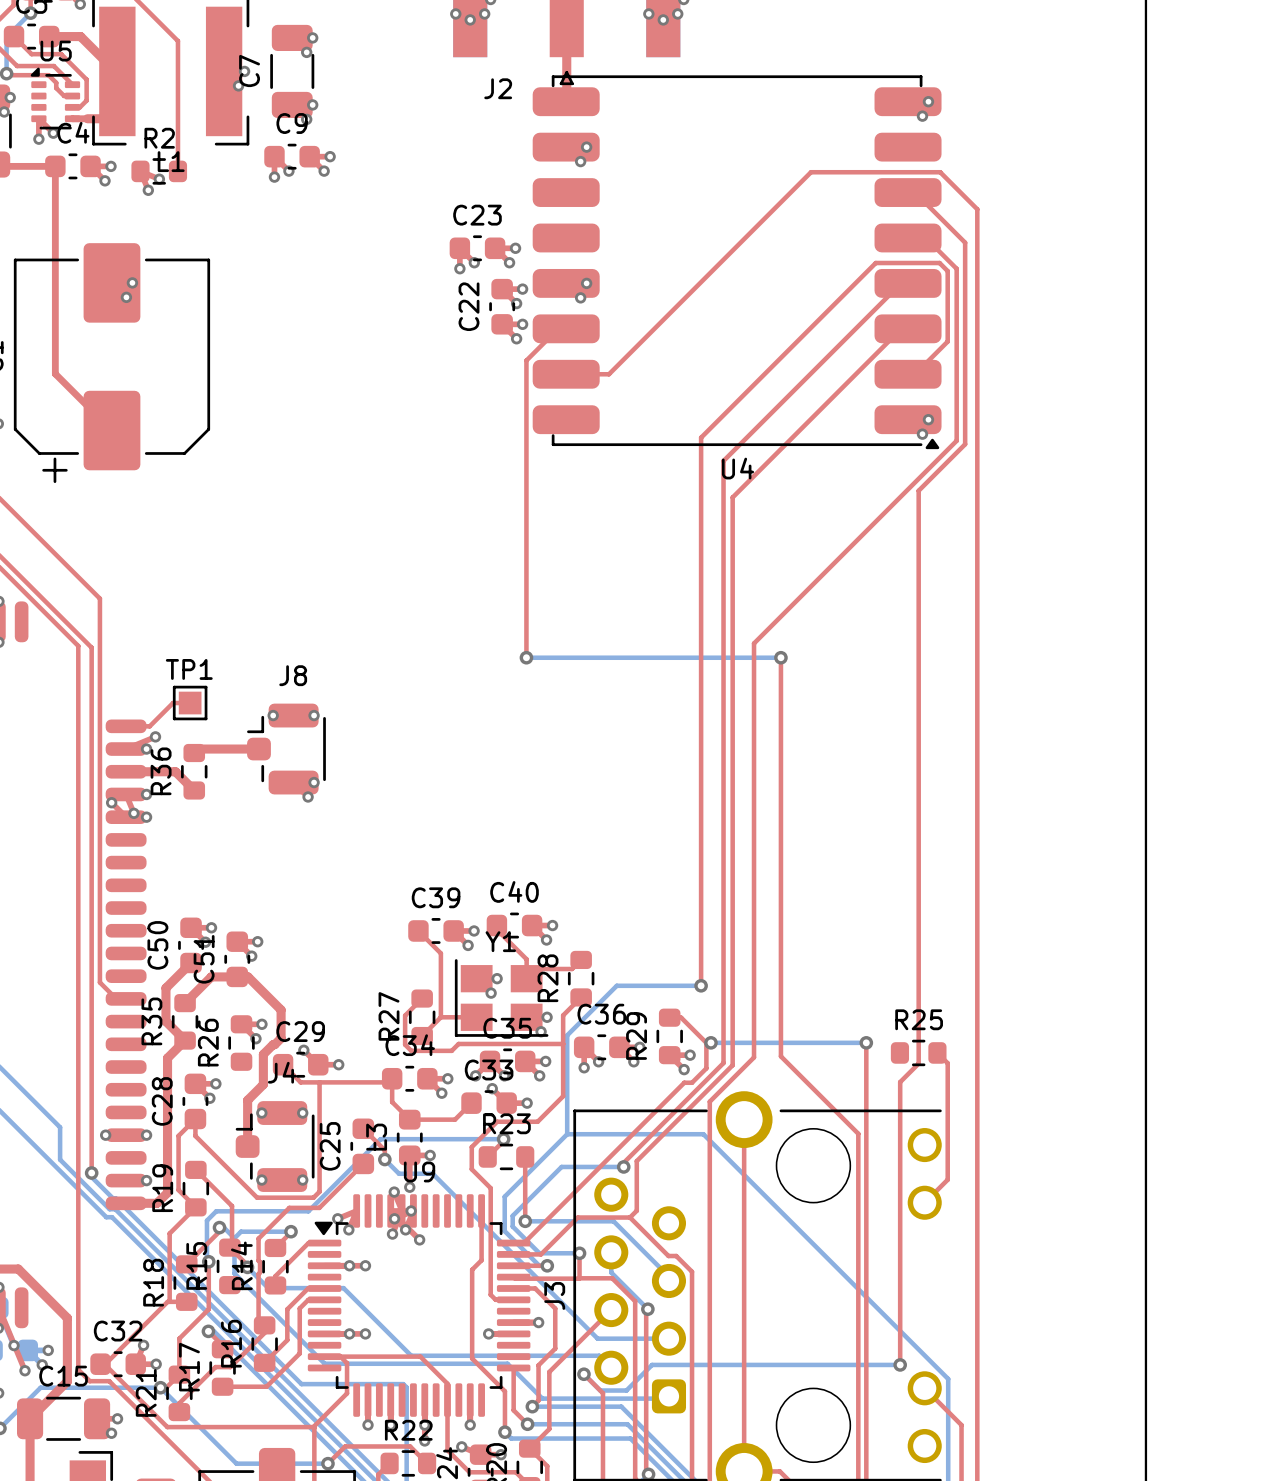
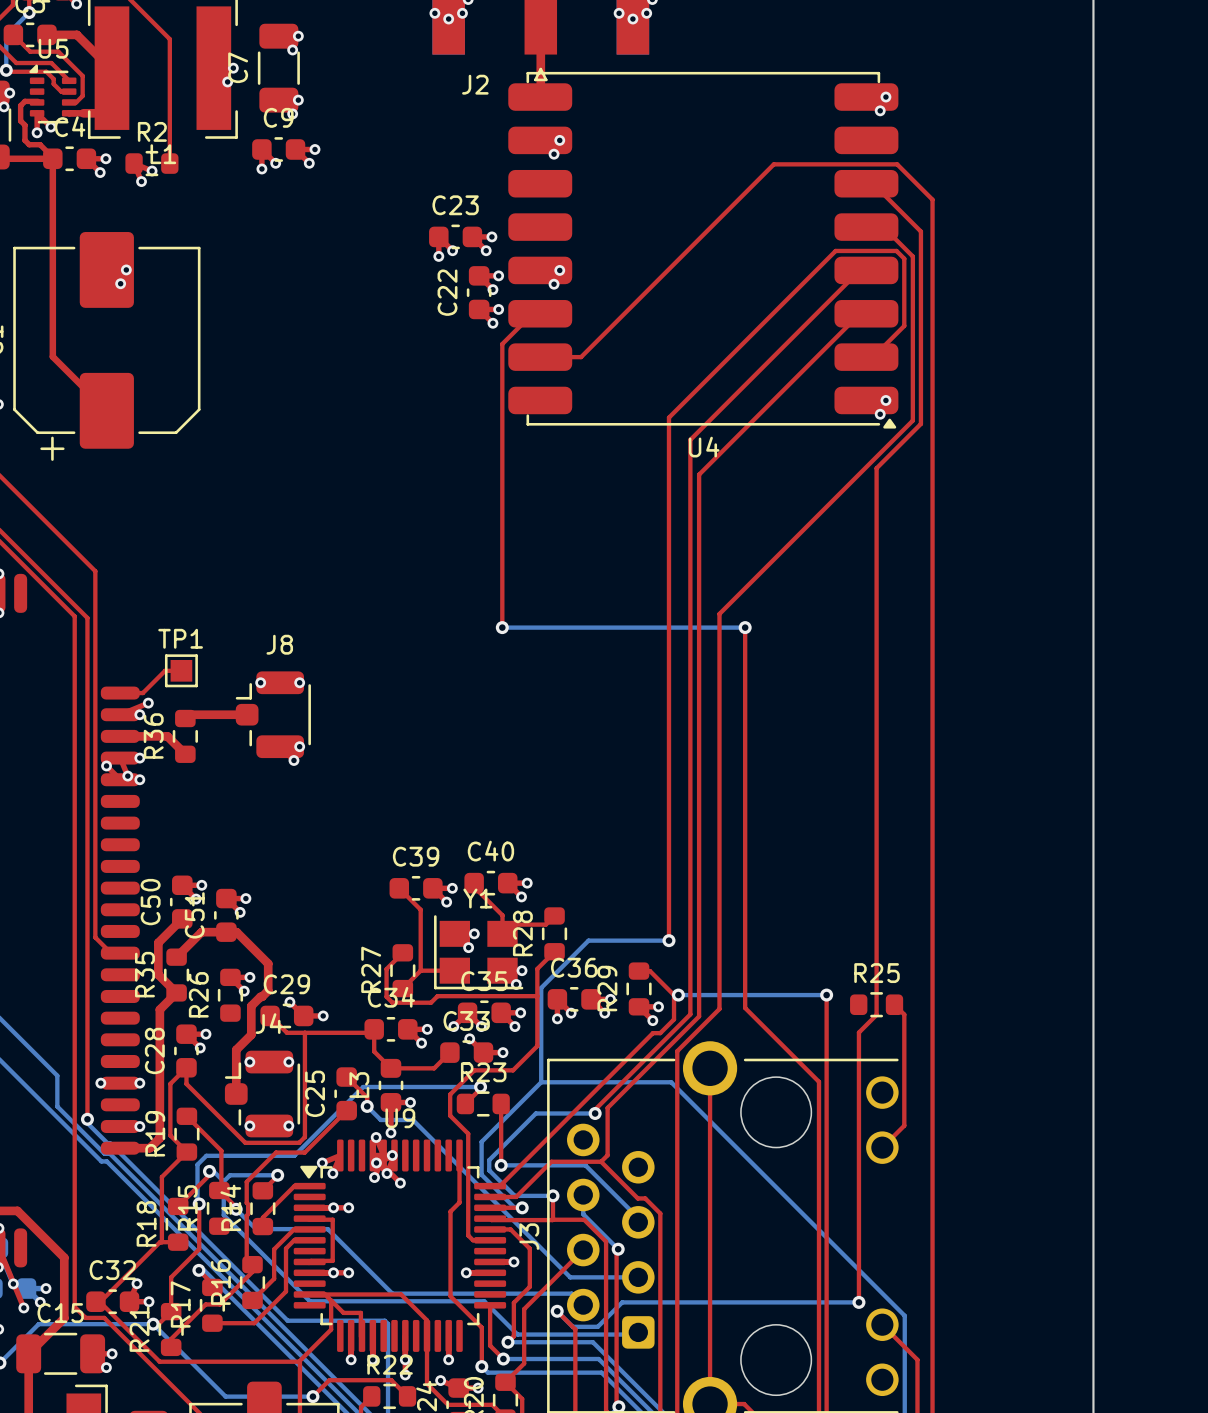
top track: none -> (37, 101) (24, 101) (20, 105) (20, 120) (24, 125) (24, 140) (29, 144) (40, 144) (53, 157)
top track: none -> (308, 1219) (332, 1219) (332, 1260) (311, 1260) (308, 1263)
top track: none -> (330, 1299) (343, 1312) (360, 1312) (360, 1336)

